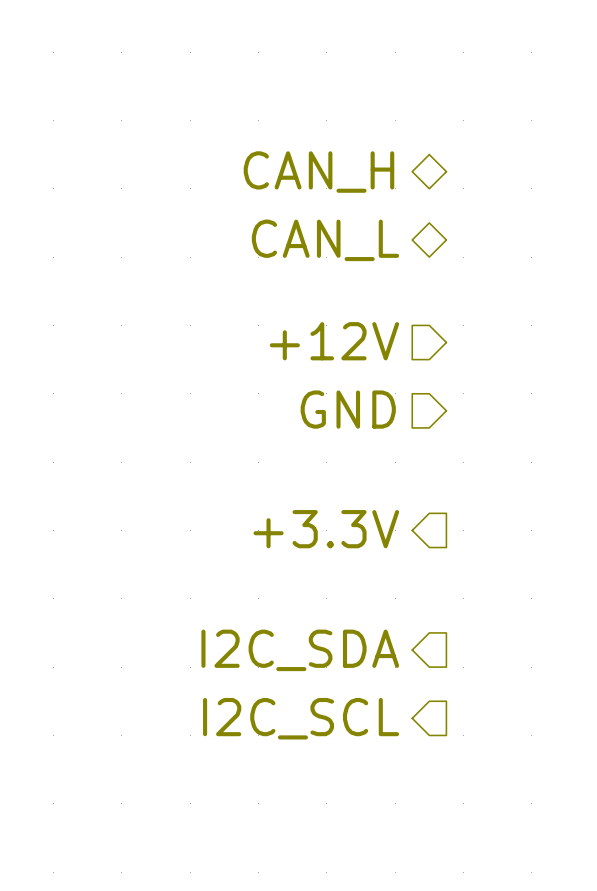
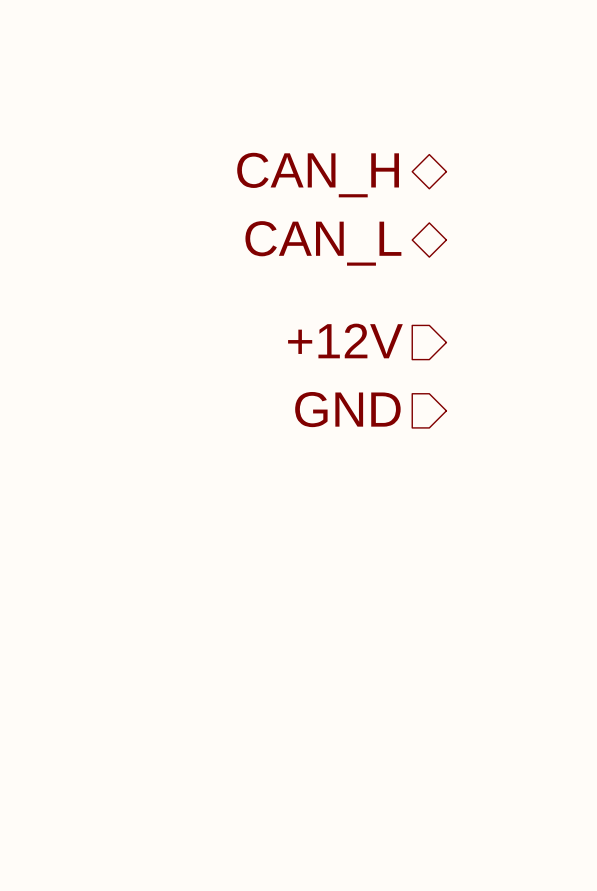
hierarchical label: +3.3V (326, 529) -> none
hierarchical label: I2C_SDA (300, 650) -> none
hierarchical label: I2C_SCL (301, 718) -> none

